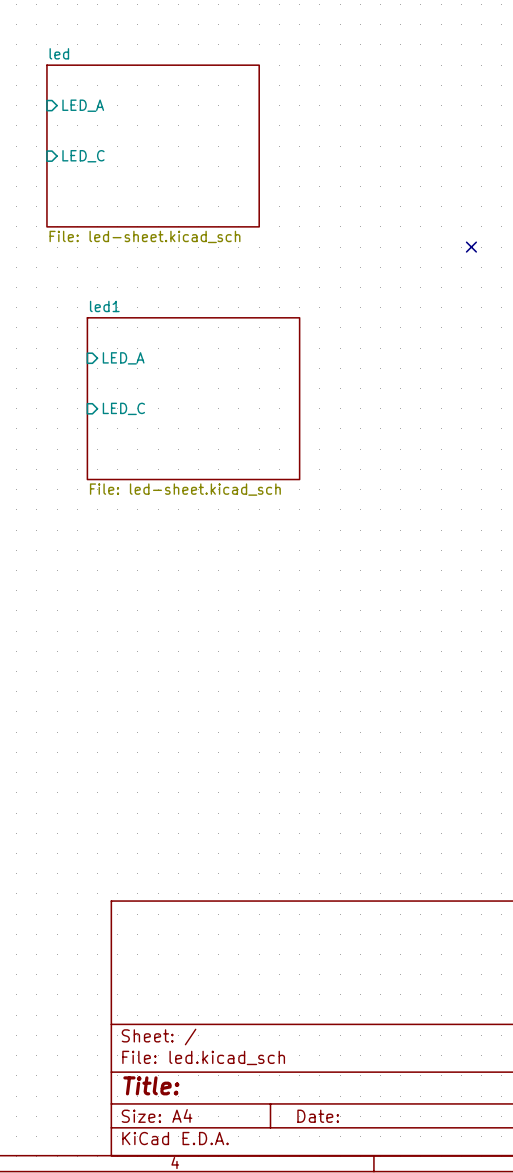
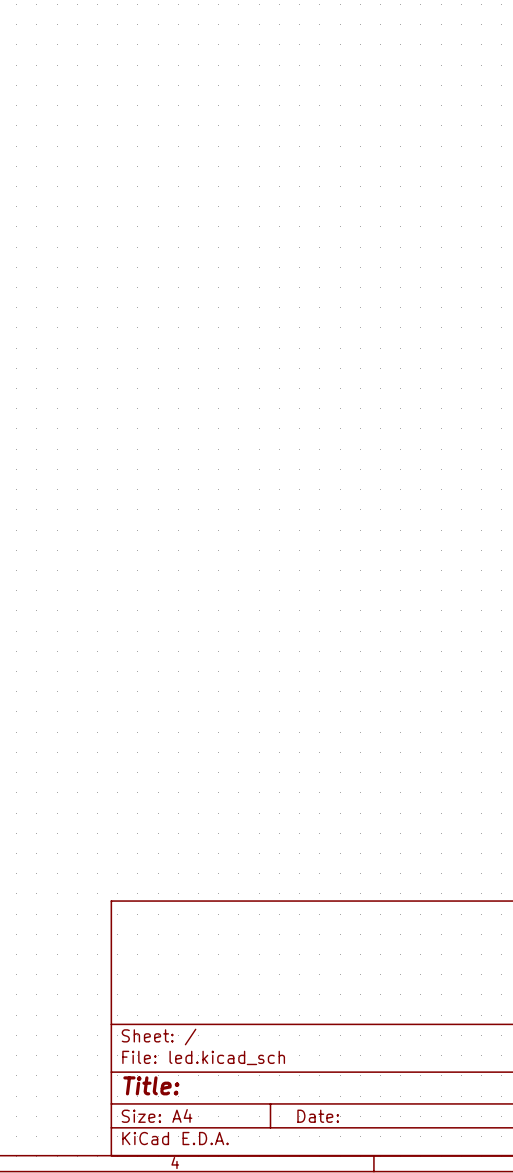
sheet pin: LED_A (83, 105) -> none
sheet led: File: led-sheet.kicad_sch (153, 146) -> none
sheet pin: LED_C (83, 156) -> none
no-connect mark: (471, 247) -> none
sheet pin: LED_A (123, 358) -> none
sheet led1: File: led-sheet.kicad_sch (193, 398) -> none
sheet pin: LED_C (123, 408) -> none

